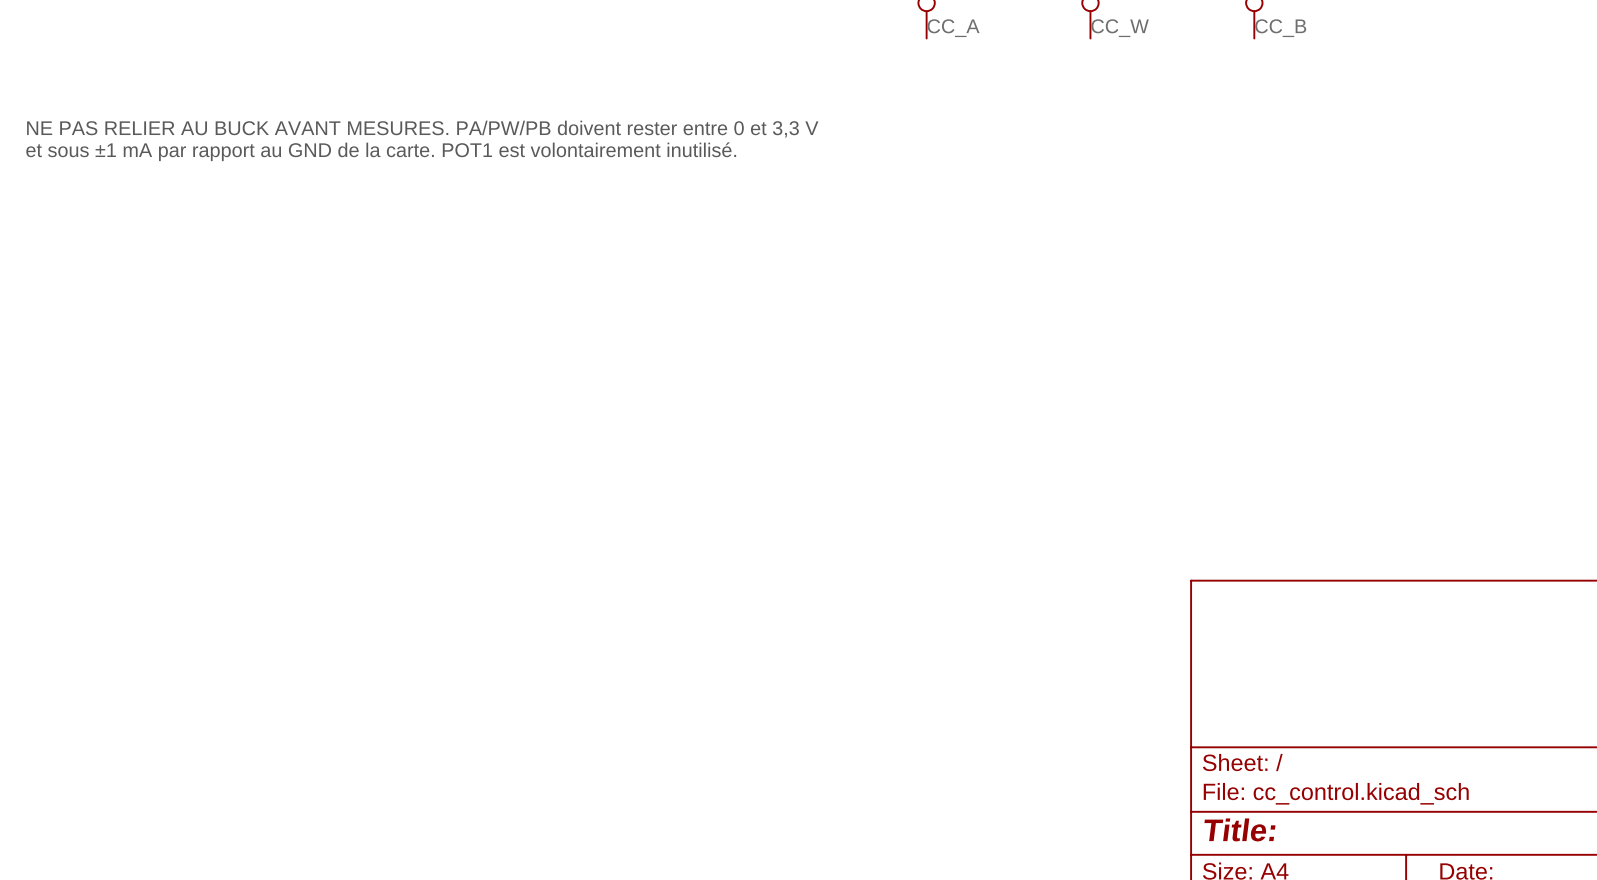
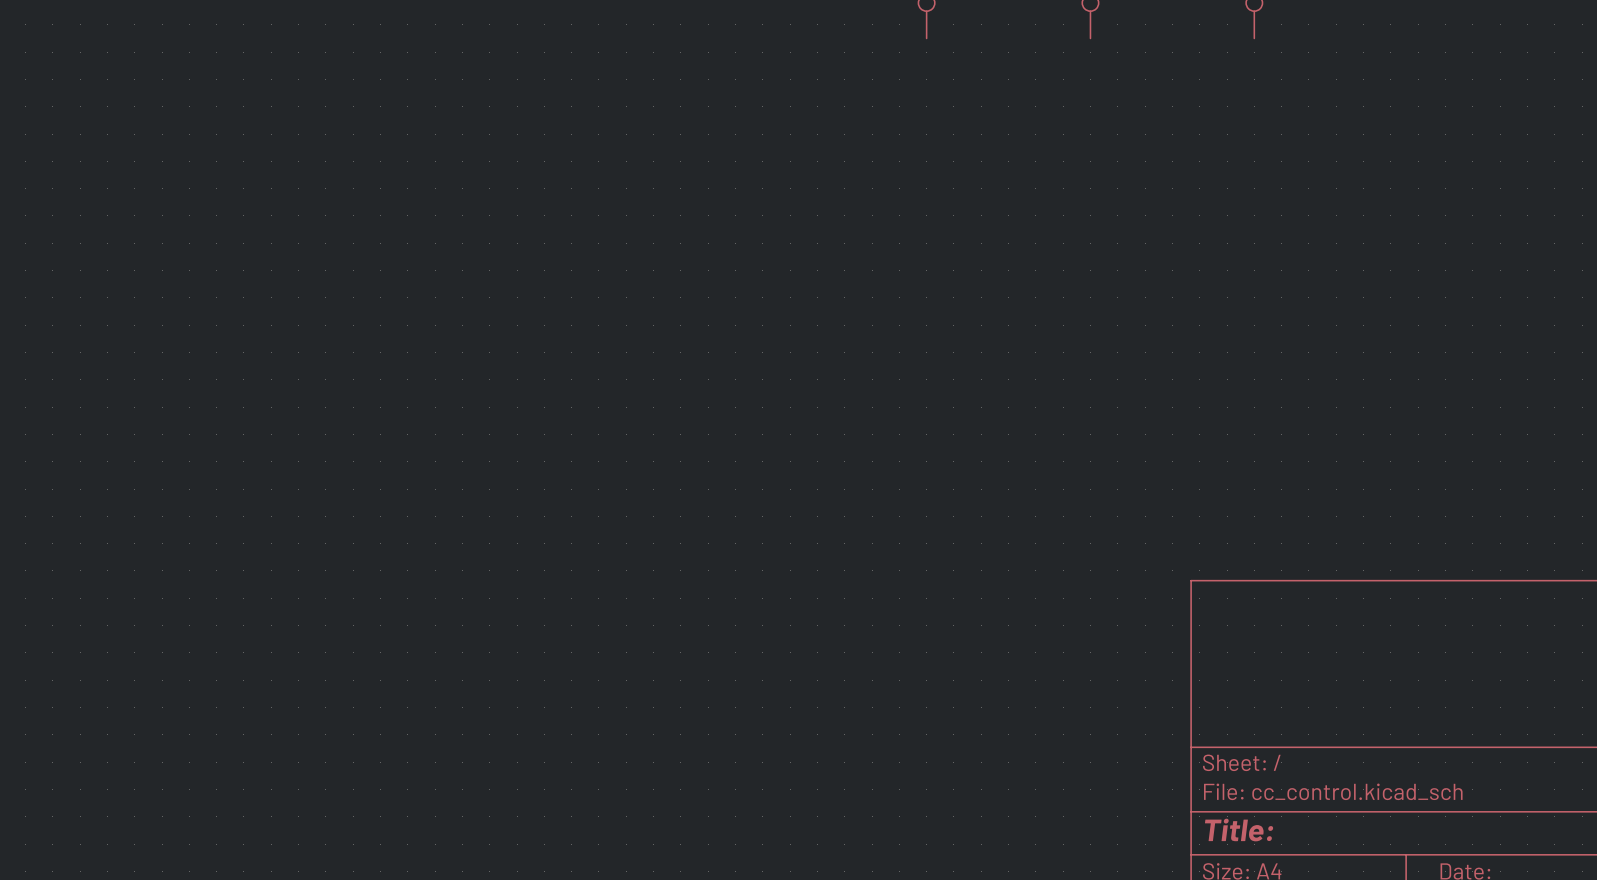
label: CC_A (953, 28) -> none
label: CC_W (1120, 28) -> none
label: CC_B (1280, 28) -> none
text: NE PAS RELIER AU BUCK AVANT MESURES. PA/PW/PB doivent rester entre 0 et 3,3 V (422, 129) -> none
text: et sous ±1 mA par rapport au GND de la carte. POT1 est volontairement inutilisé. (381, 151) -> none

